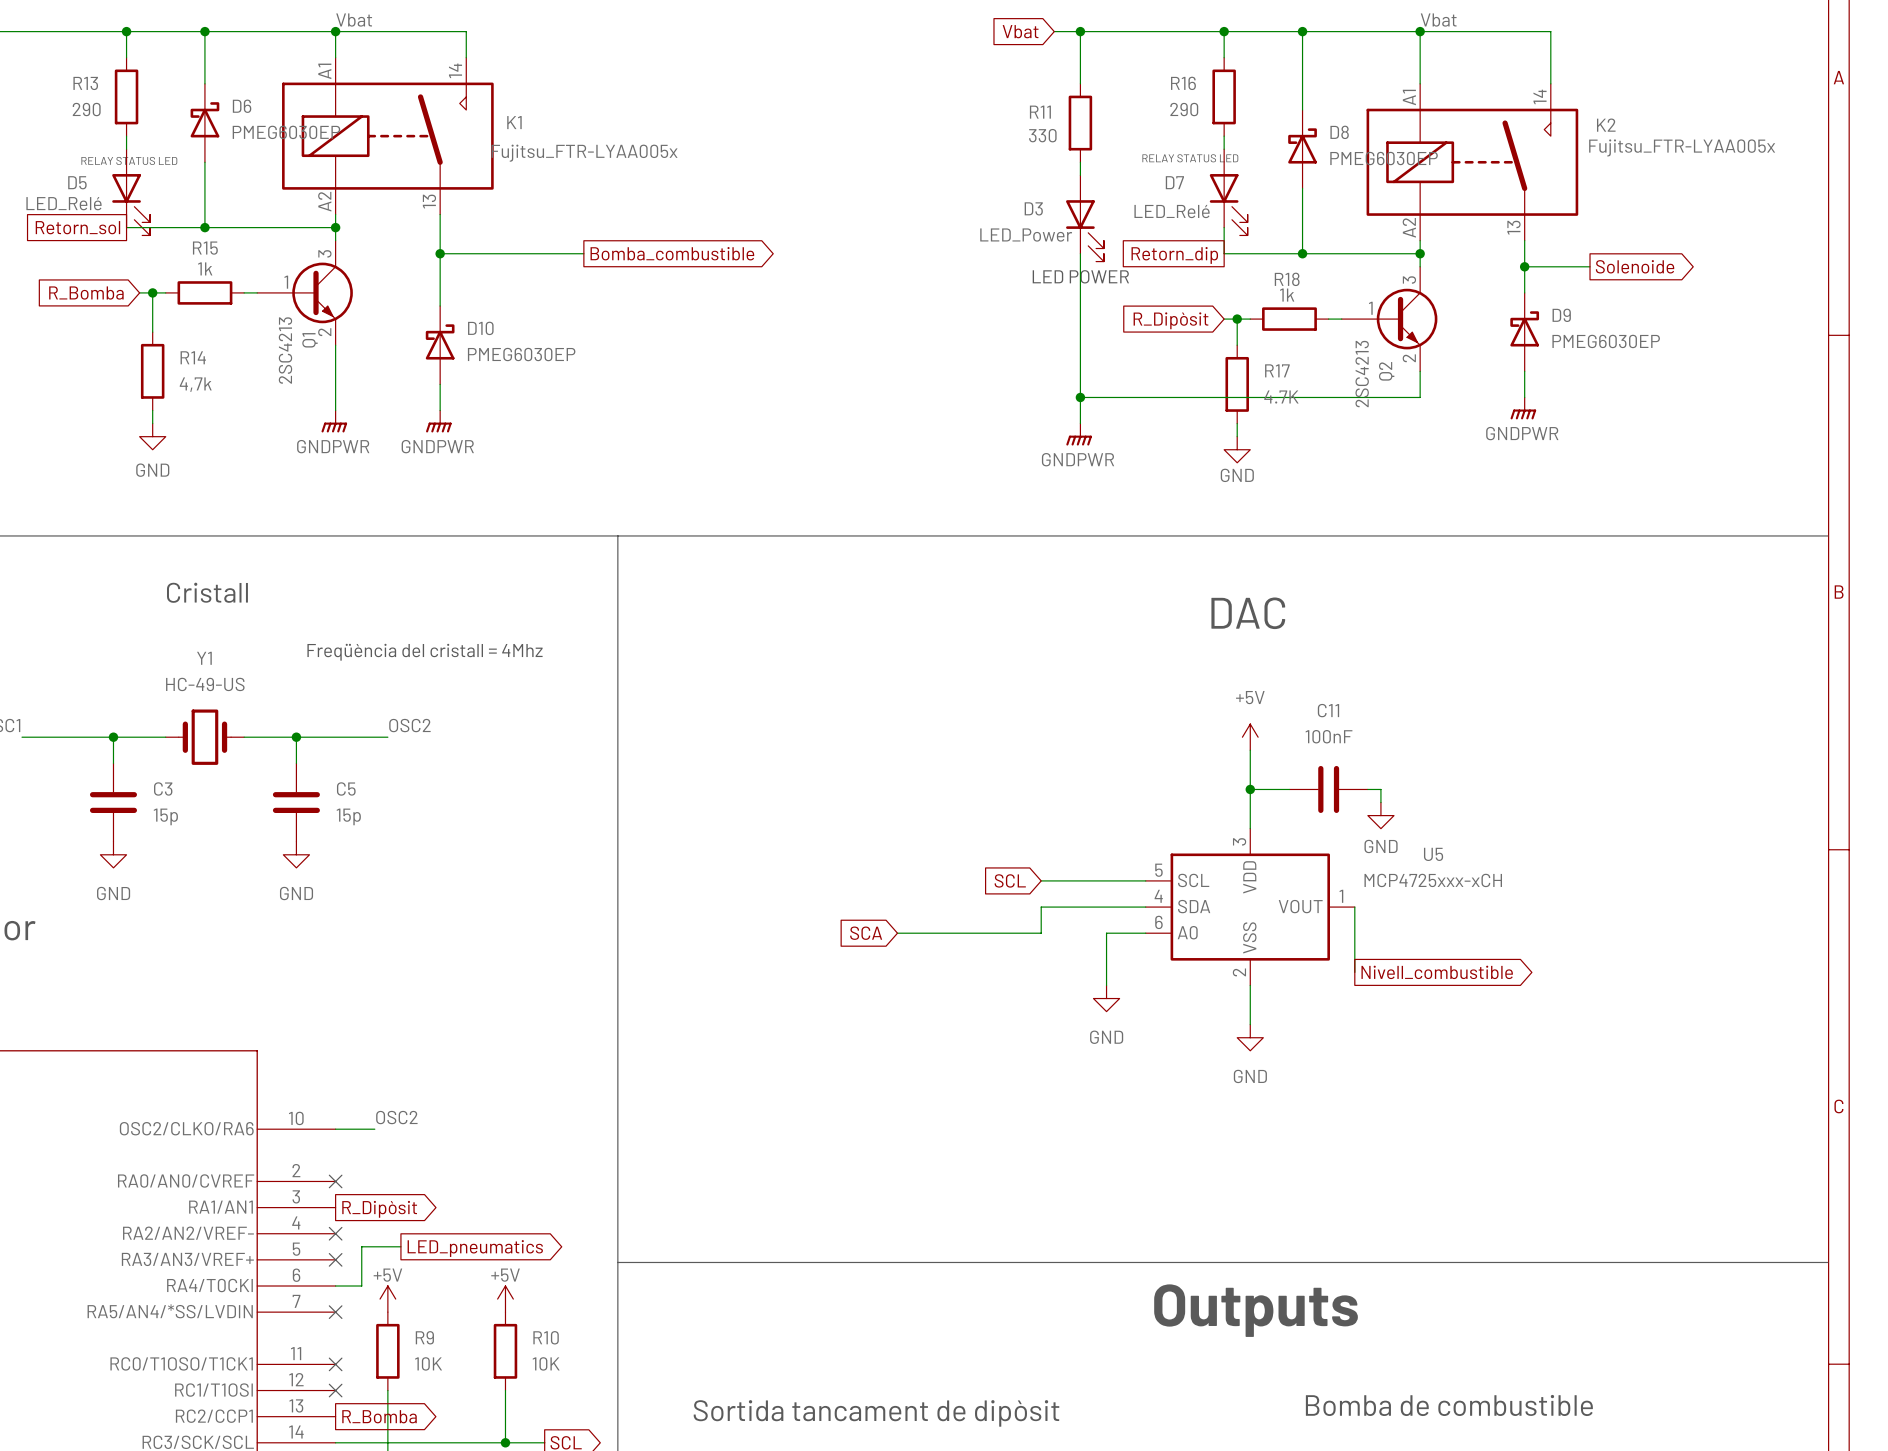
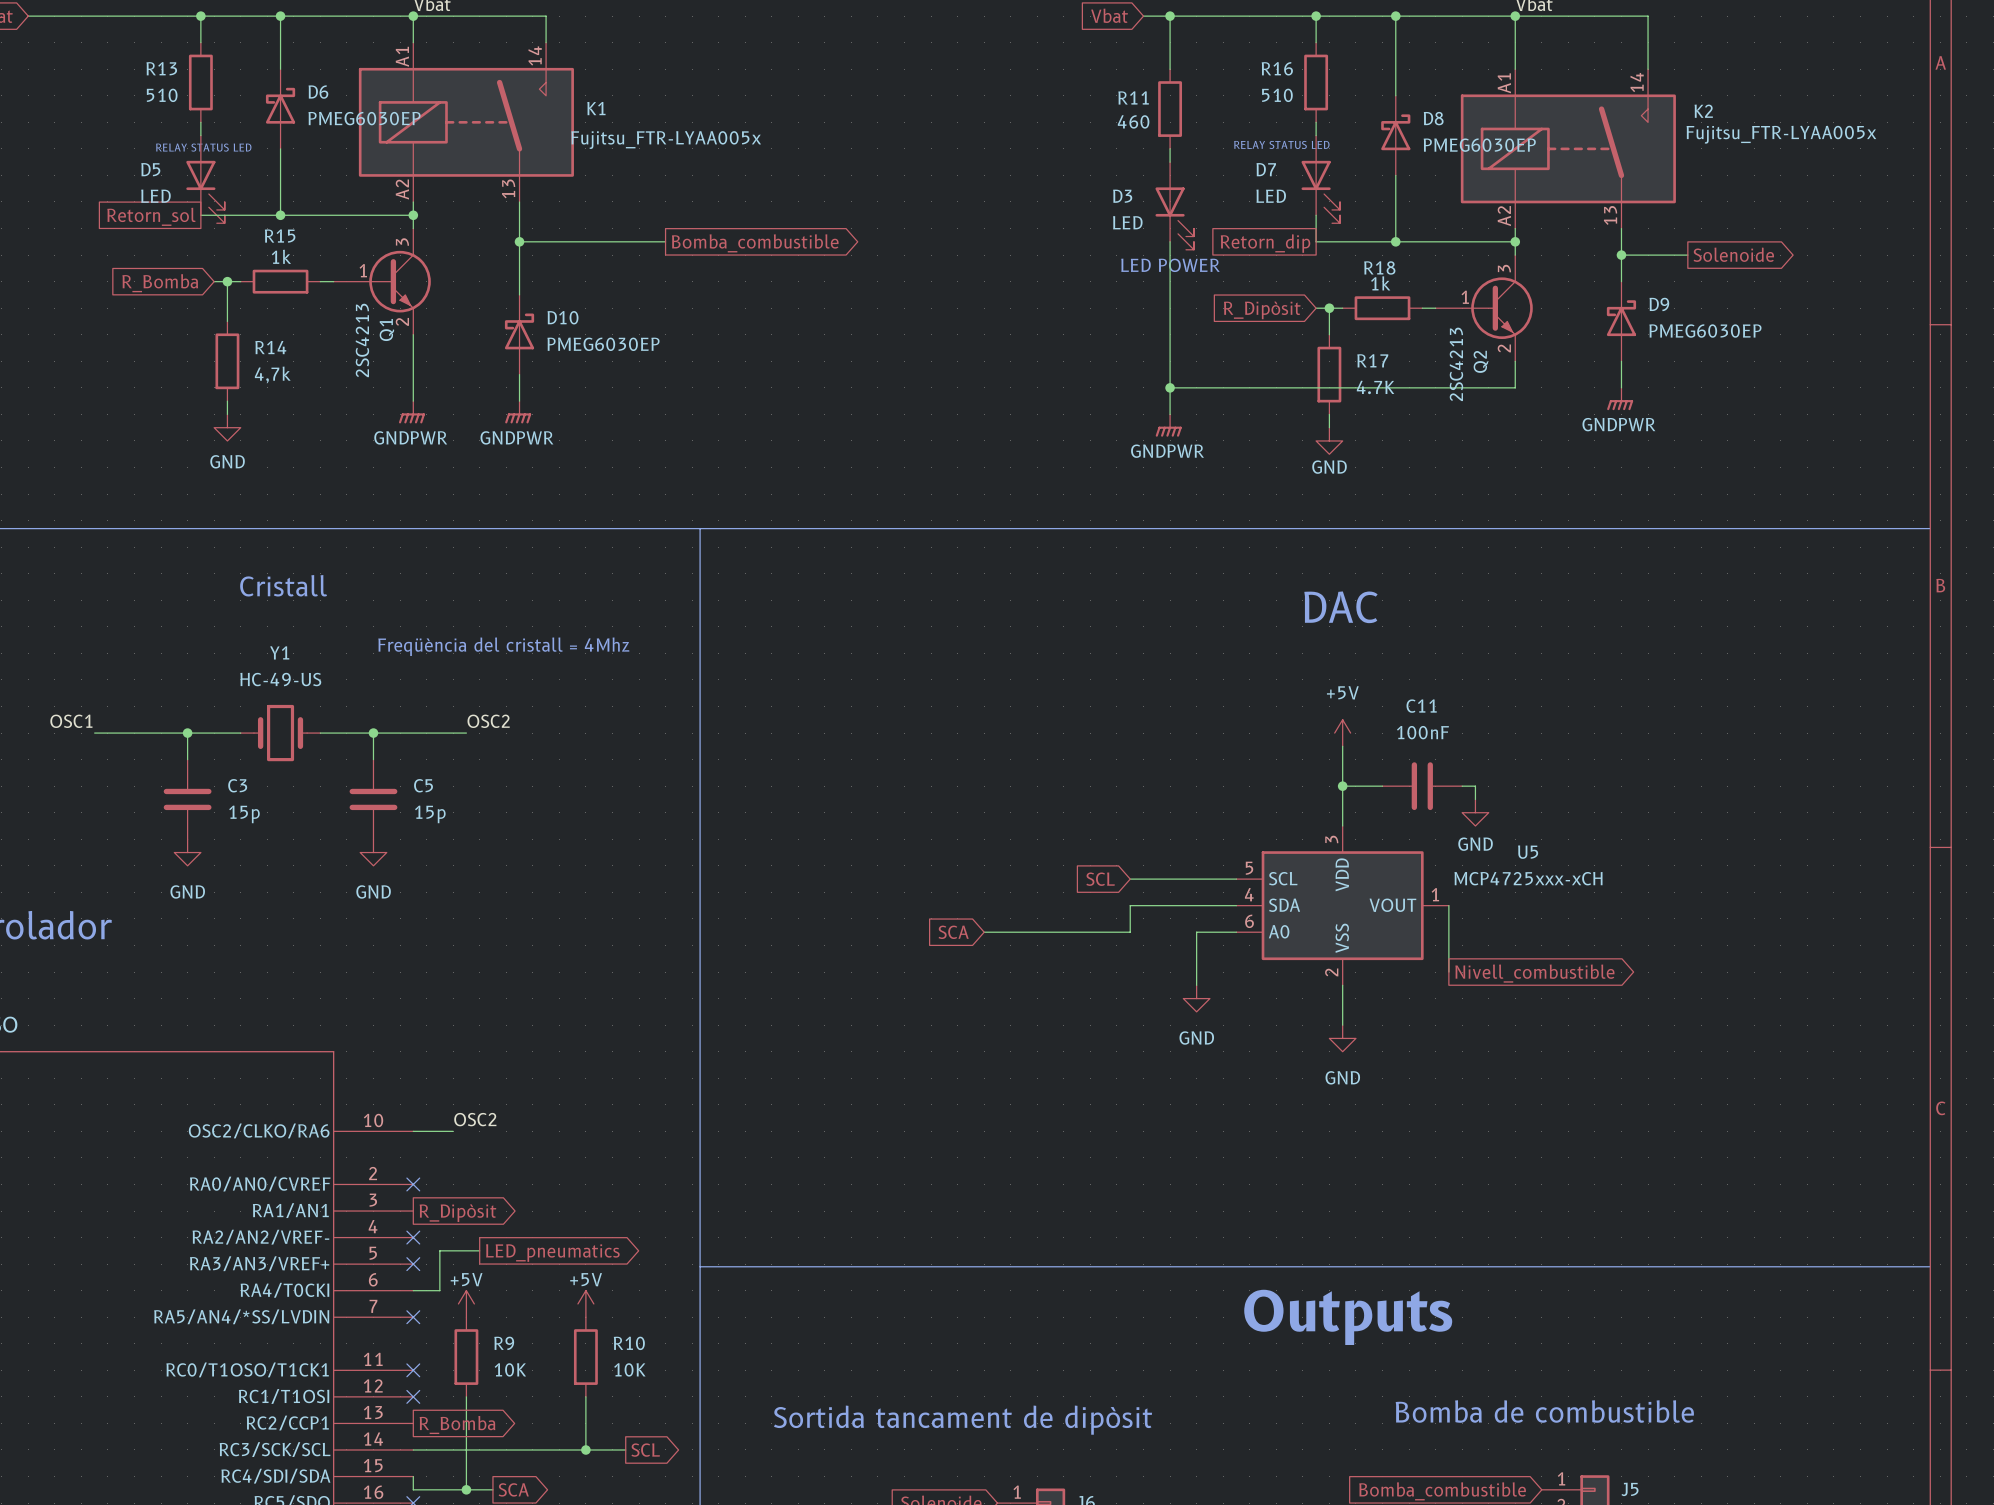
R13 value: 290 (86, 109) -> 510 (162, 95)
R16 value: 290 (1184, 109) -> 510 (1277, 95)
R11 value: 330 (1042, 135) -> 460 (1133, 121)
D5 value: LED_Relé (63, 203) -> LED (155, 196)
D7 value: LED_Relé (1172, 211) -> LED (1271, 196)
D3 value: LED_Power (1026, 235) -> LED (1127, 222)

